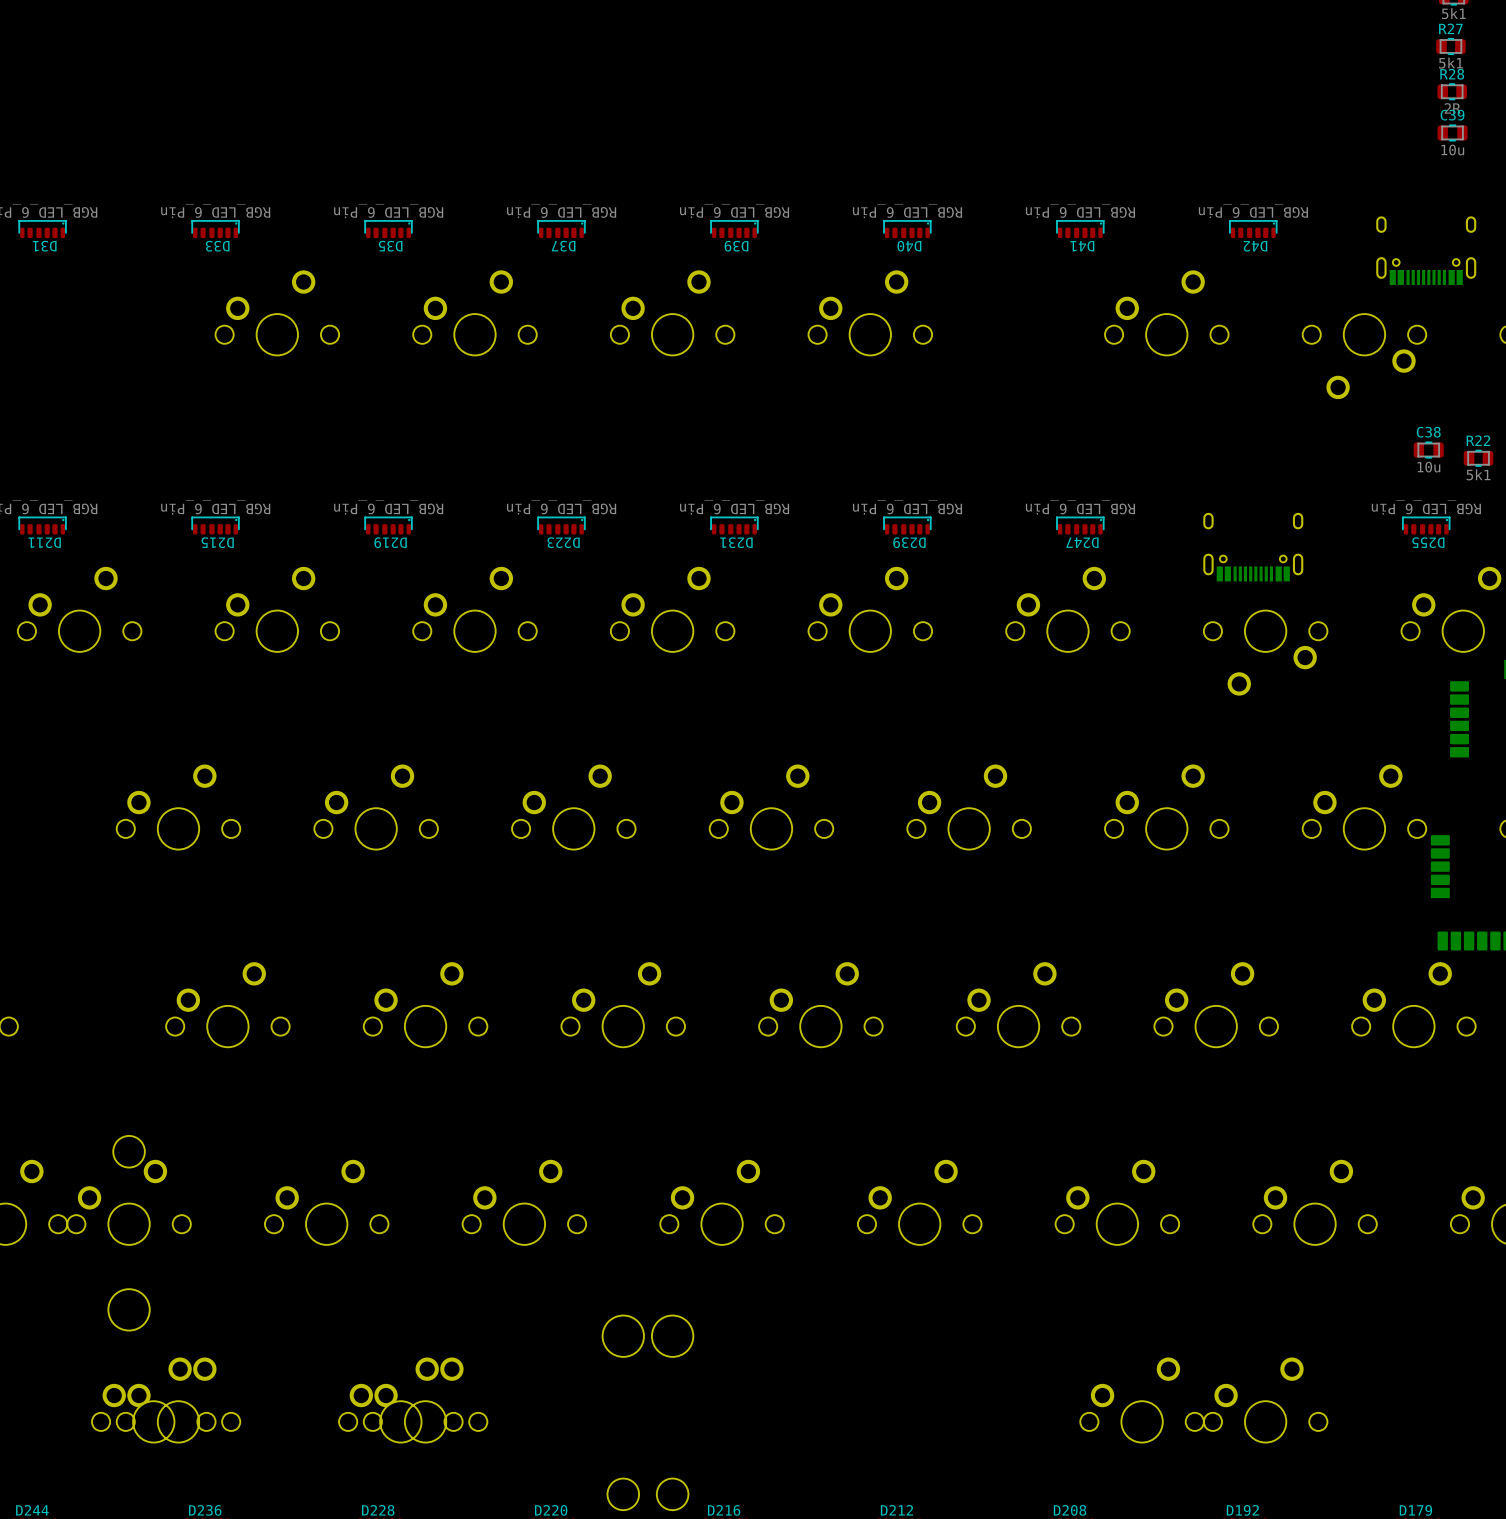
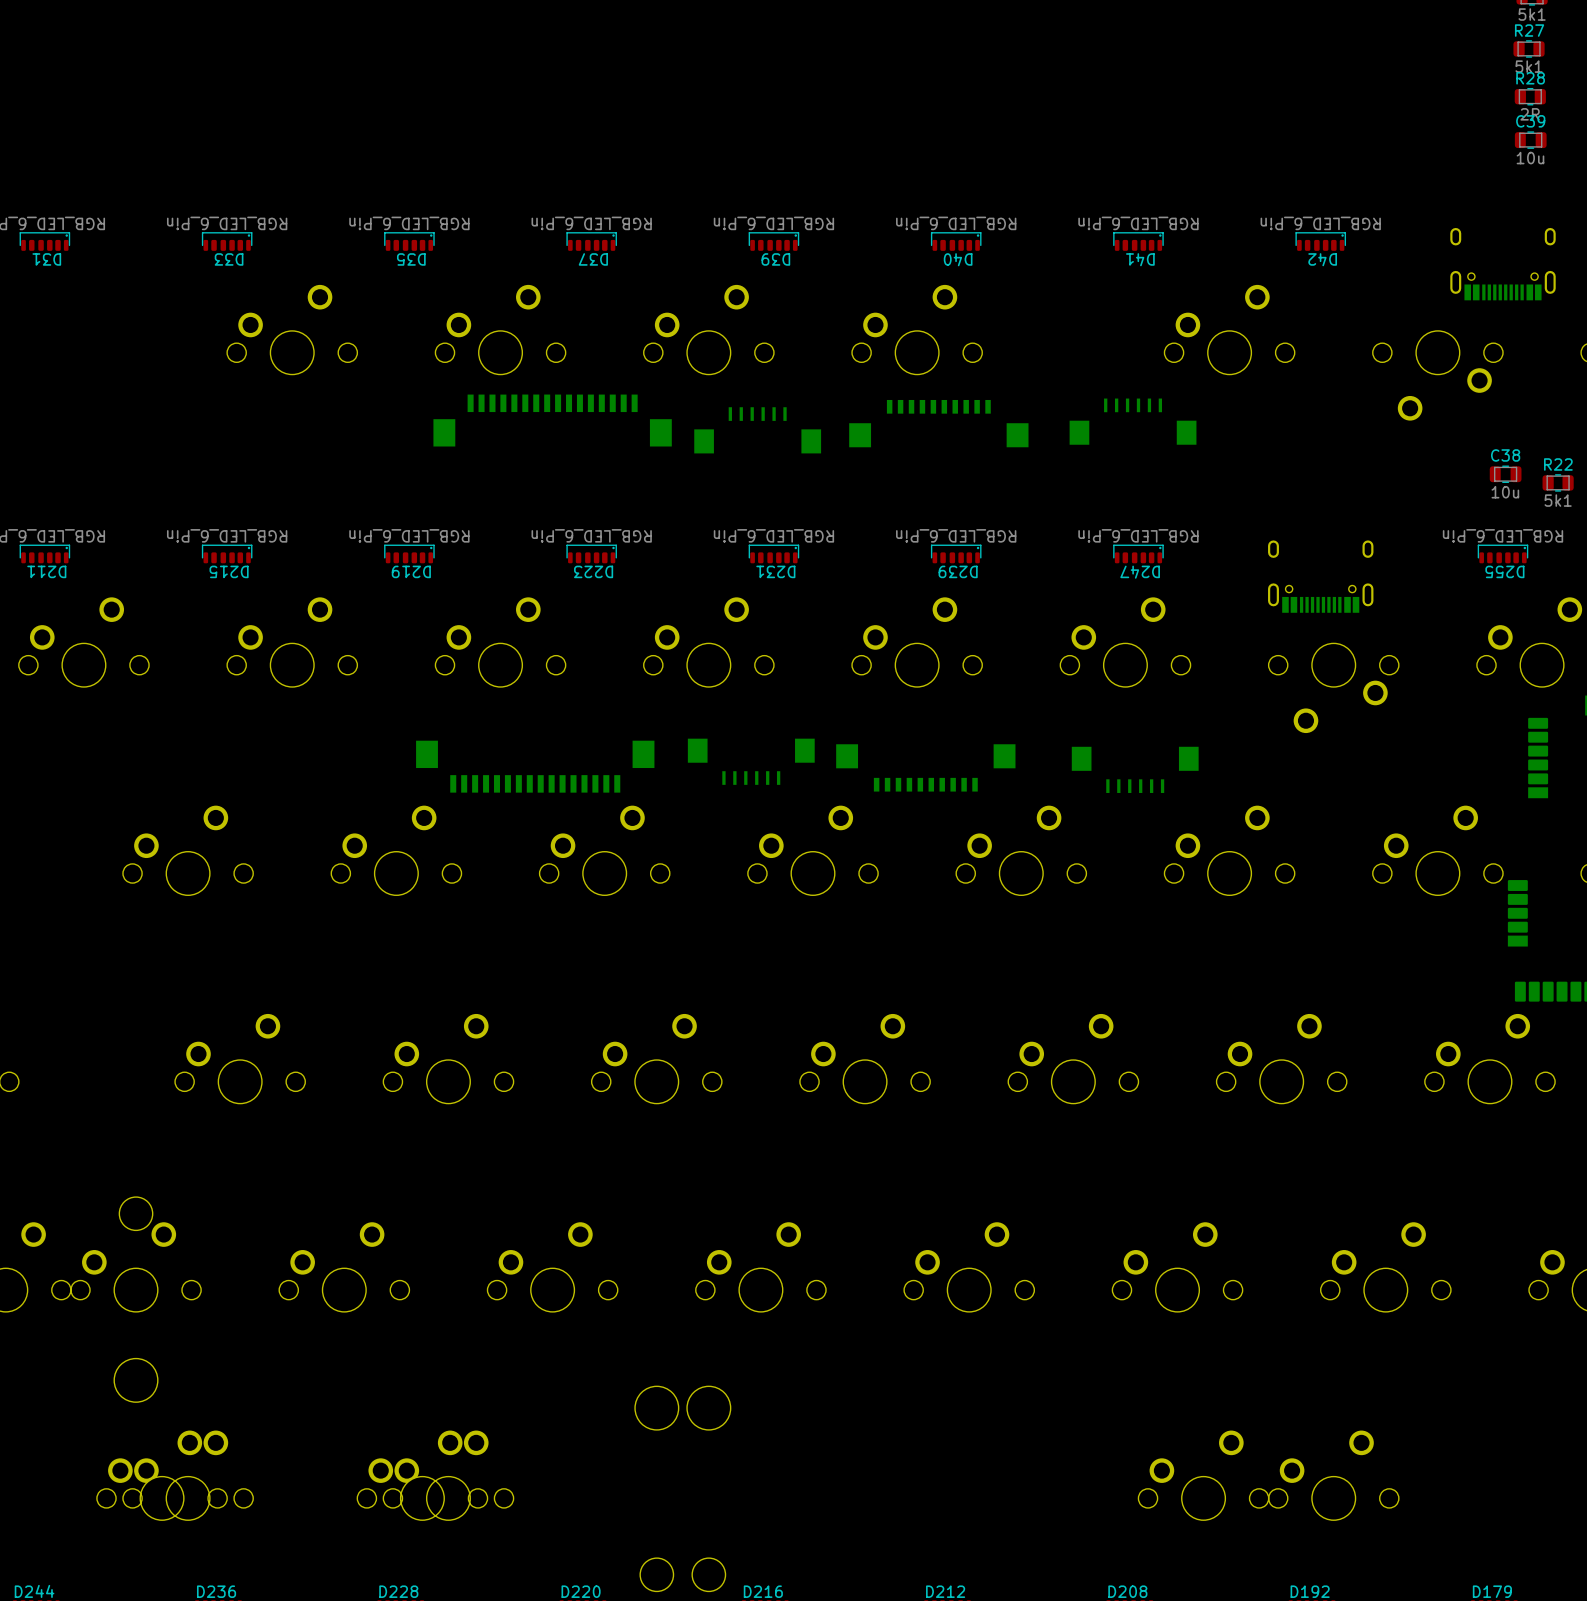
part: none -> (552, 420)
part: none -> (1133, 421)
part: none -> (938, 423)
part: none -> (757, 430)
part: none -> (751, 761)
part: none -> (535, 766)
part: none -> (925, 767)
part: none -> (1135, 769)

